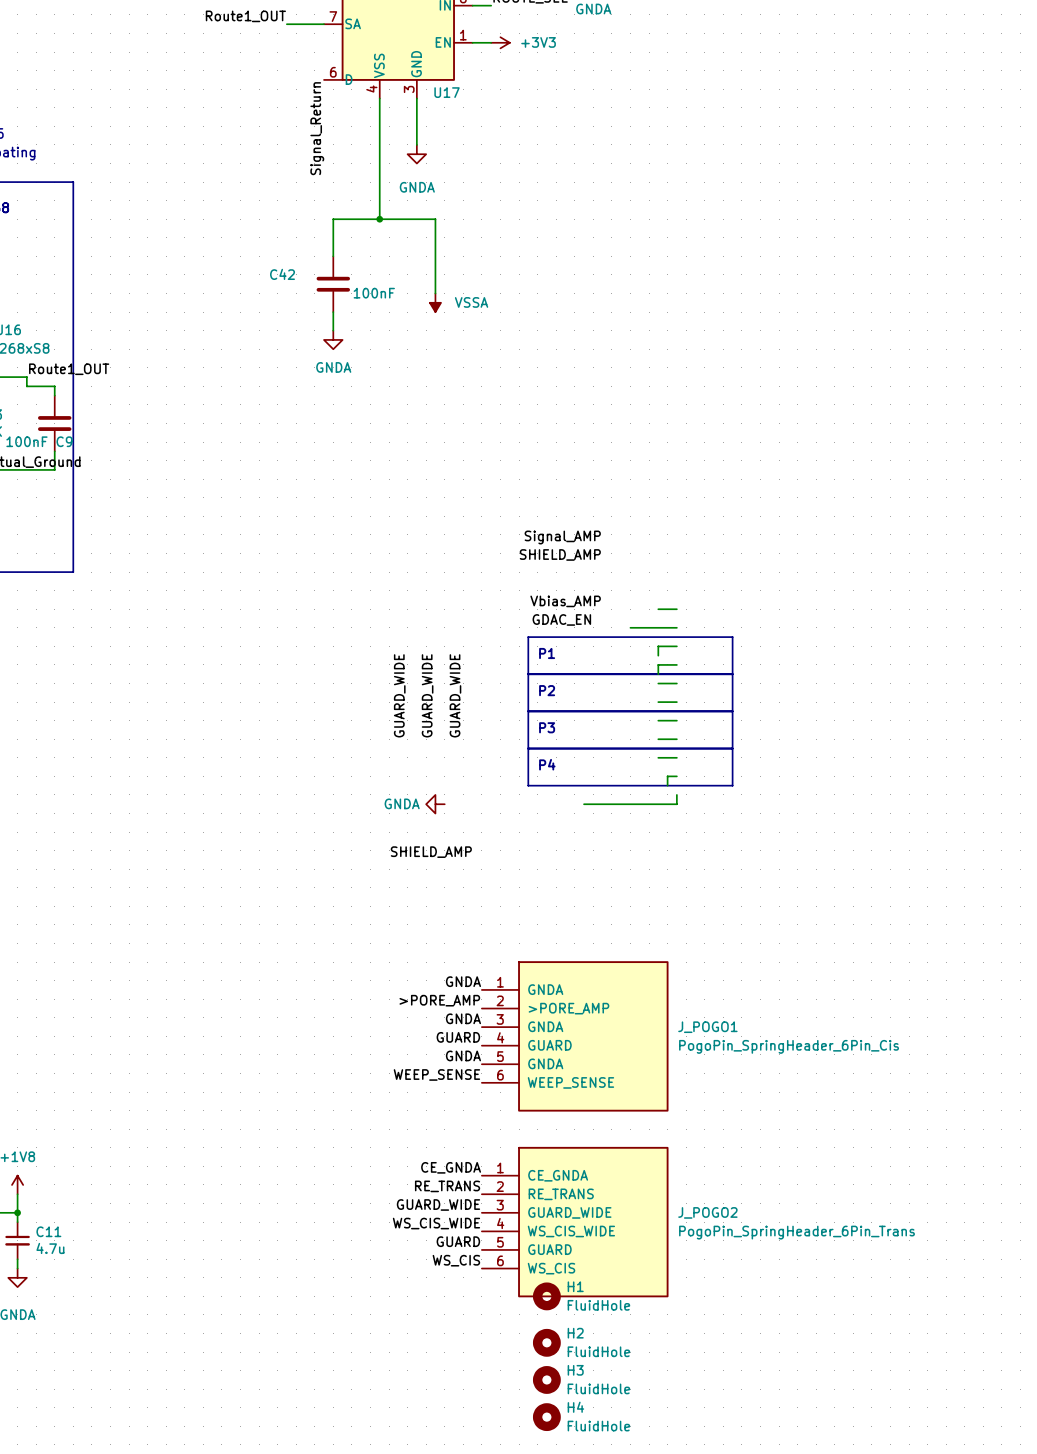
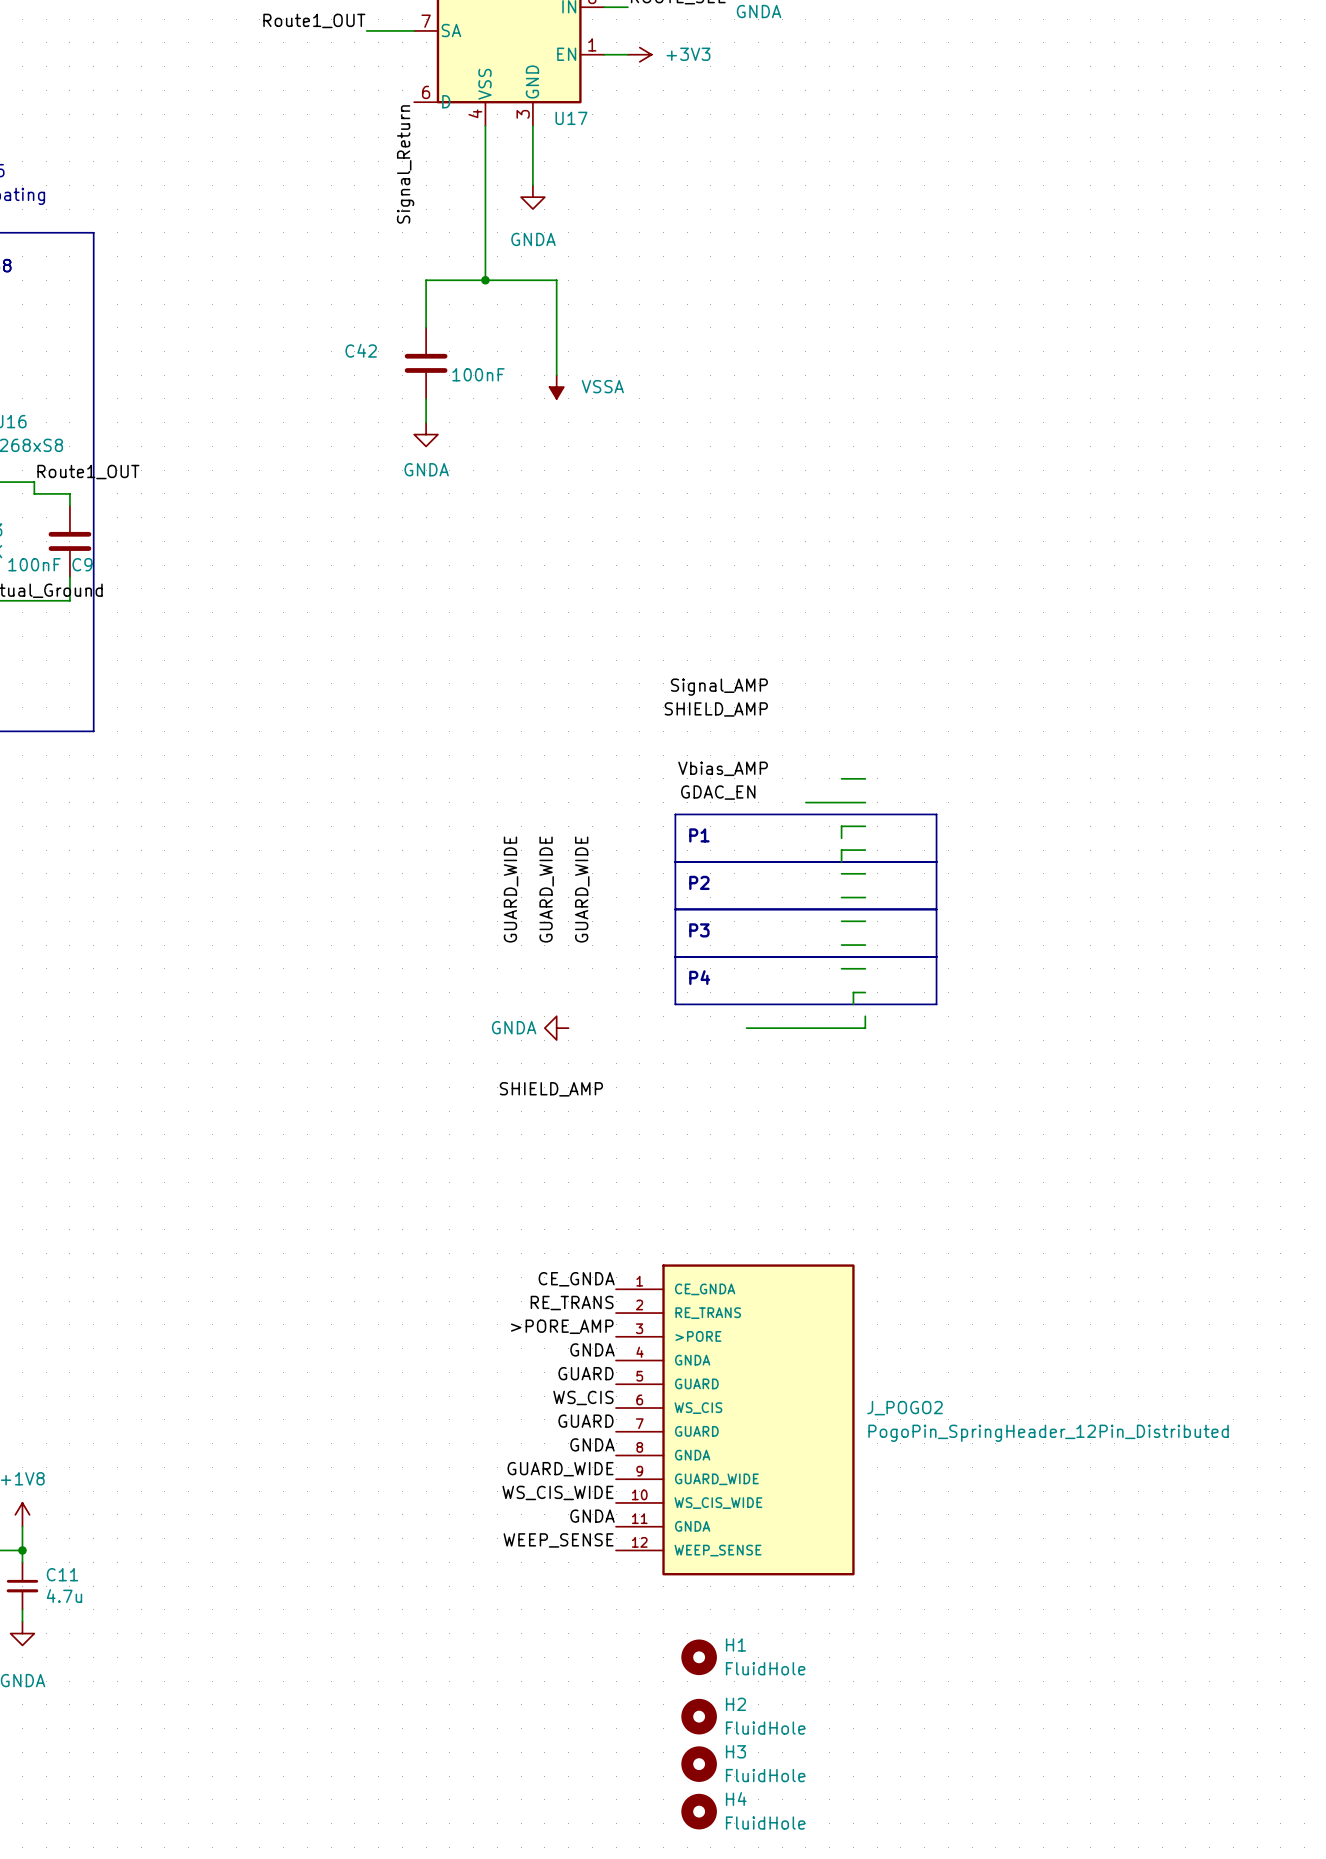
label position: GNDA (463, 981) -> GNDA (592, 1444)
label: >PORE_AMP (439, 1000) -> CE_GNDA (576, 1279)
label: GNDA (463, 1018) -> RE_TRANS (572, 1303)
J_POGO1: PogoPin_SpringHeader_6Pin_Cis (575, 1036) -> none
label: GUARD (458, 1037) -> >PORE_AMP (562, 1326)
label: WEEP_SENSE (436, 1074) -> GUARD (585, 1373)
J_POGO2 symbol: [481, 1146, 669, 1298] -> [616, 1264, 855, 1576]
label: none -> GUARD_WIDE (560, 1469)
label: CE_GNDA (451, 1167) -> WS_CIS_WIDE (557, 1492)
label: RE_TRANS (447, 1186) -> GNDA (592, 1516)
label: GUARD_WIDE (438, 1204) -> WEEP_SENSE (558, 1540)
label: WS_CIS_WIDE (436, 1223) -> none
J_POGO2 value: PogoPin_SpringHeader_6Pin_Trans (797, 1232) -> PogoPin_SpringHeader_12Pin_Distributed (1048, 1433)
label position: GUARD (458, 1241) -> GUARD (585, 1421)
label position: WS_CIS (456, 1260) -> WS_CIS (583, 1397)

